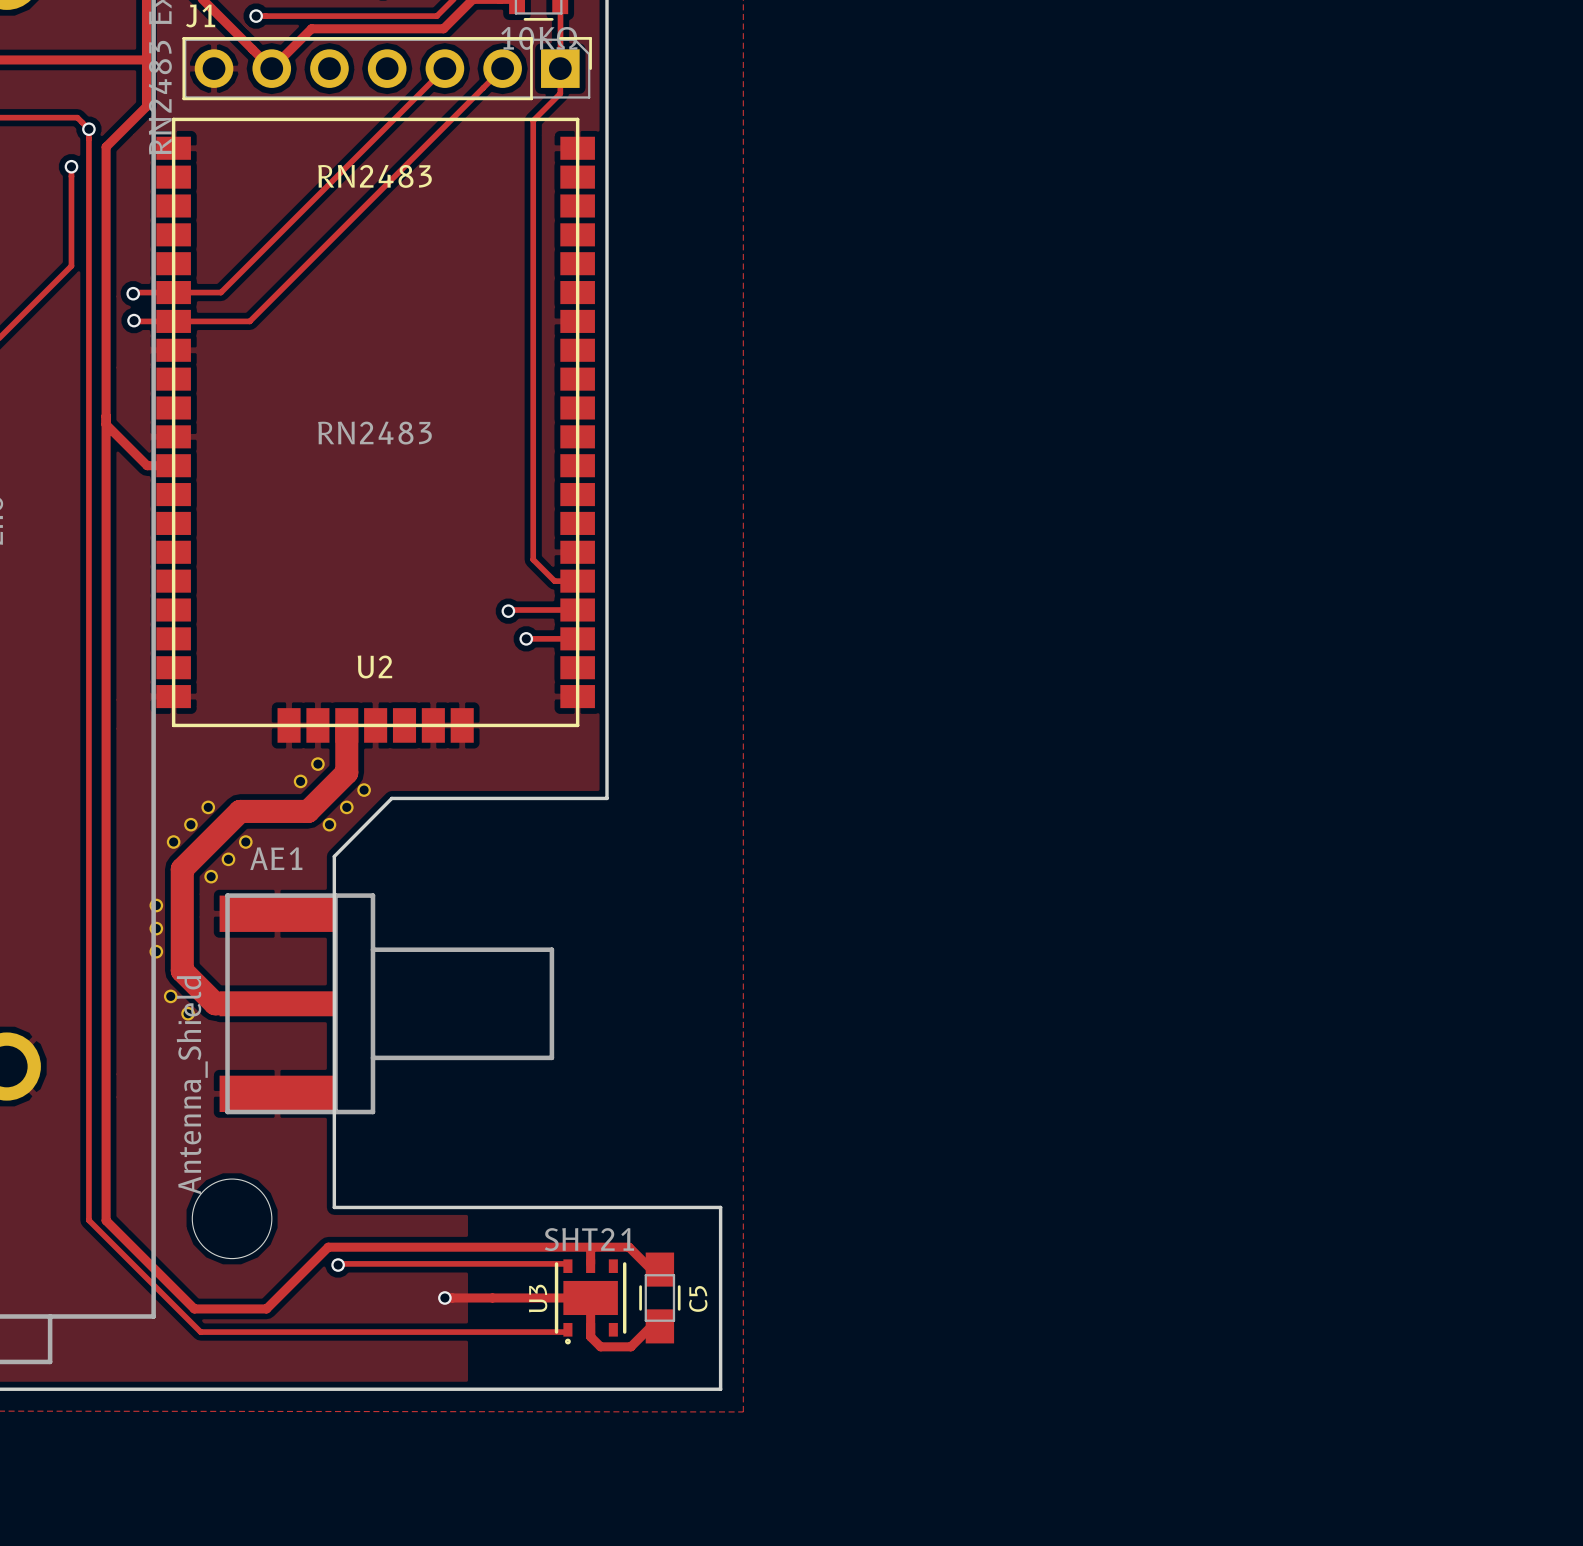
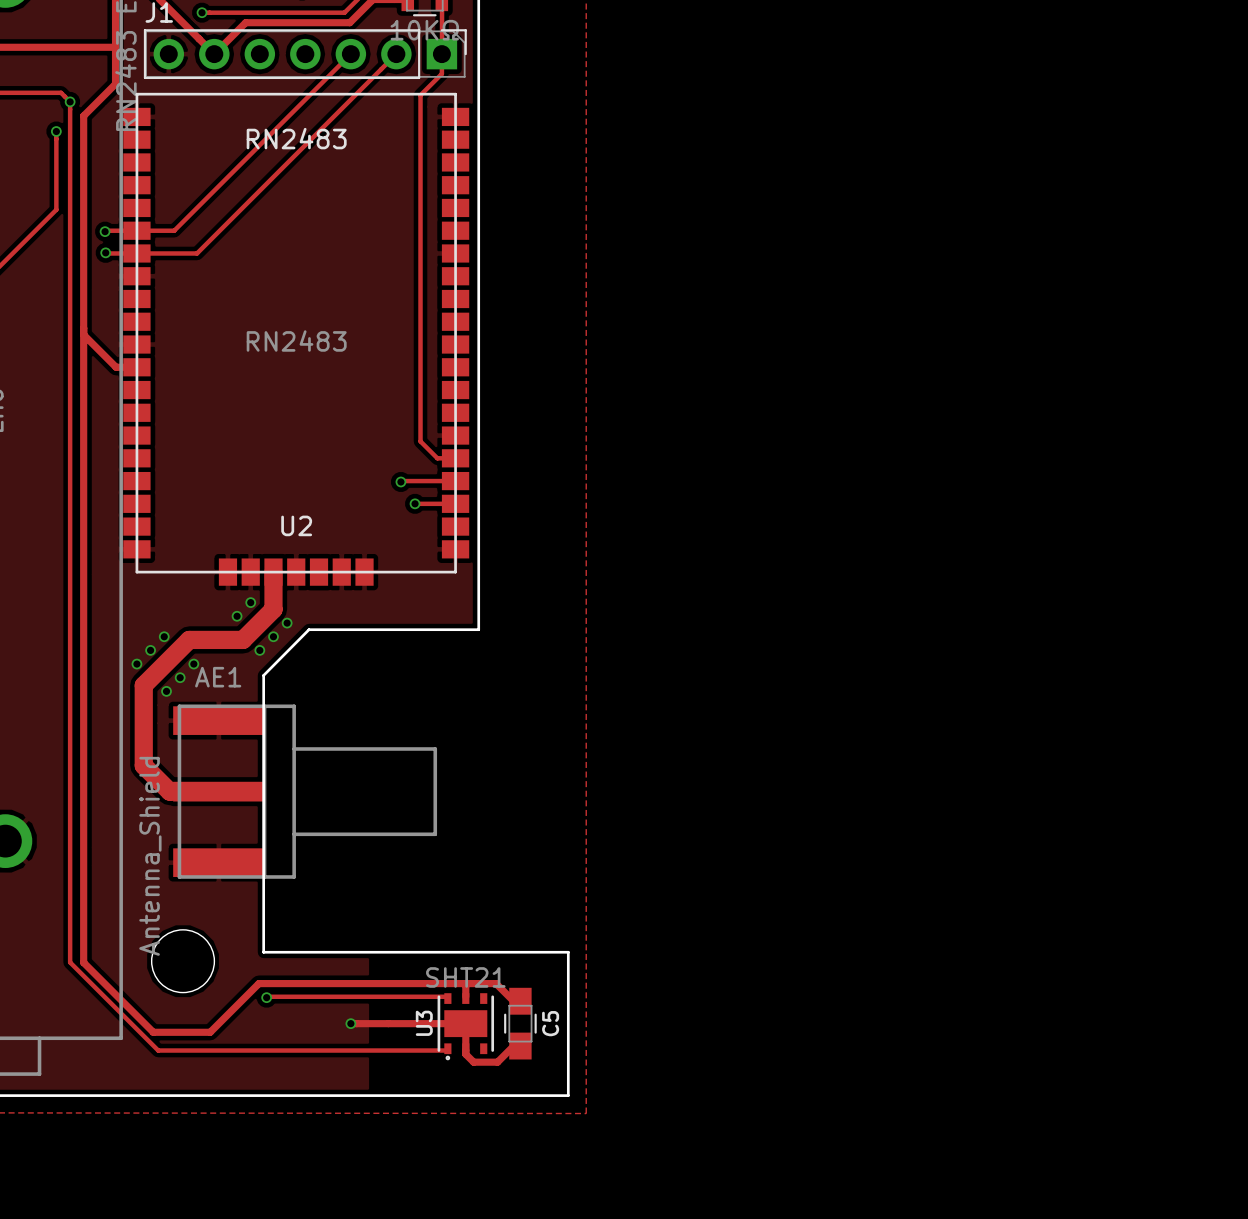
part: (156, 905) -> none
part: (156, 928) -> none
part: (156, 951) -> none
part: (170, 996) -> none
part: (188, 1013) -> none

